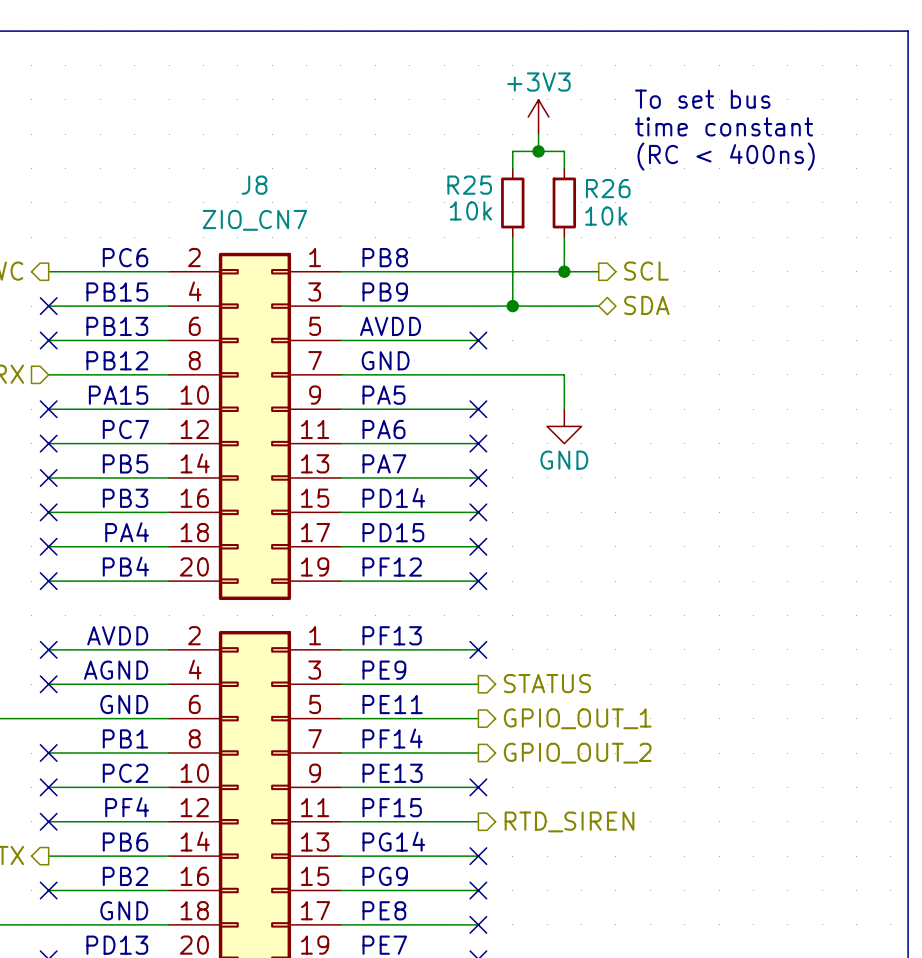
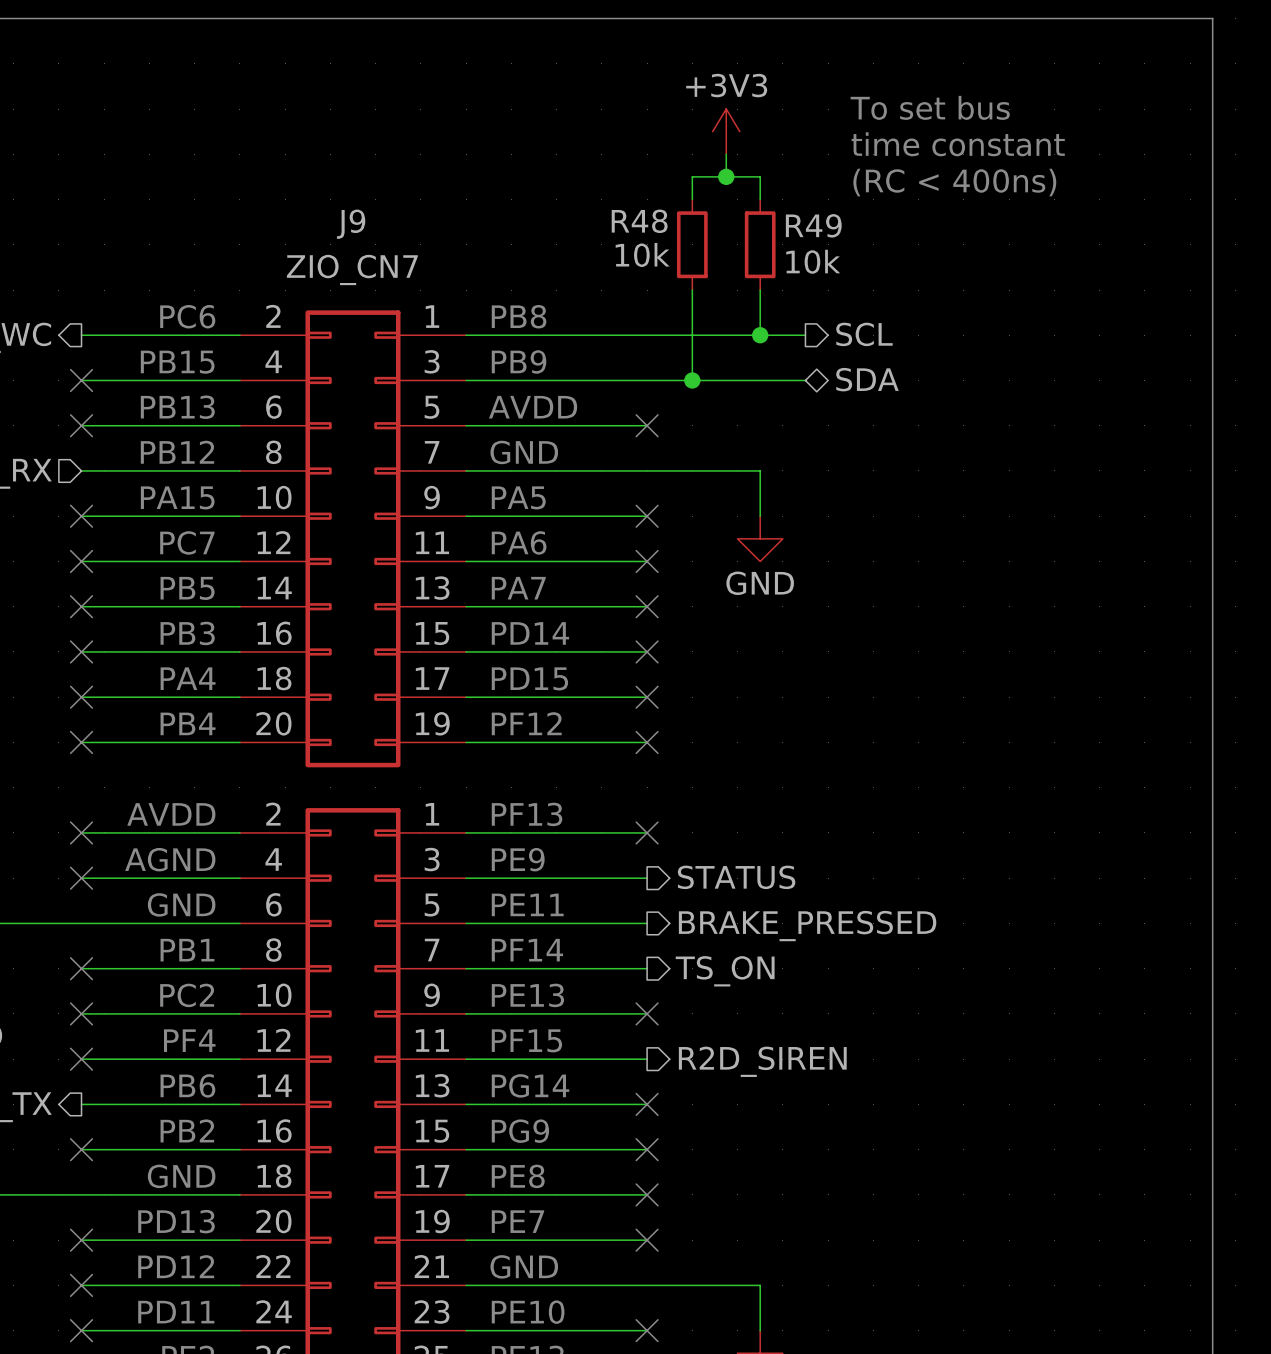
J8 name: J8 (254, 185) -> J9 (351, 224)
R25 name: R25 (469, 185) -> R48 (639, 221)
R26 name: R26 (608, 188) -> R49 (813, 225)
hierarchical label: GPIO_OUT_1 (577, 718) -> BRAKE_PRESSED (807, 926)
hierarchical label: GPIO_OUT_2 (577, 753) -> TS_ON (725, 971)
hierarchical label: RTD_SIREN (569, 821) -> R2D_SIREN (762, 1061)

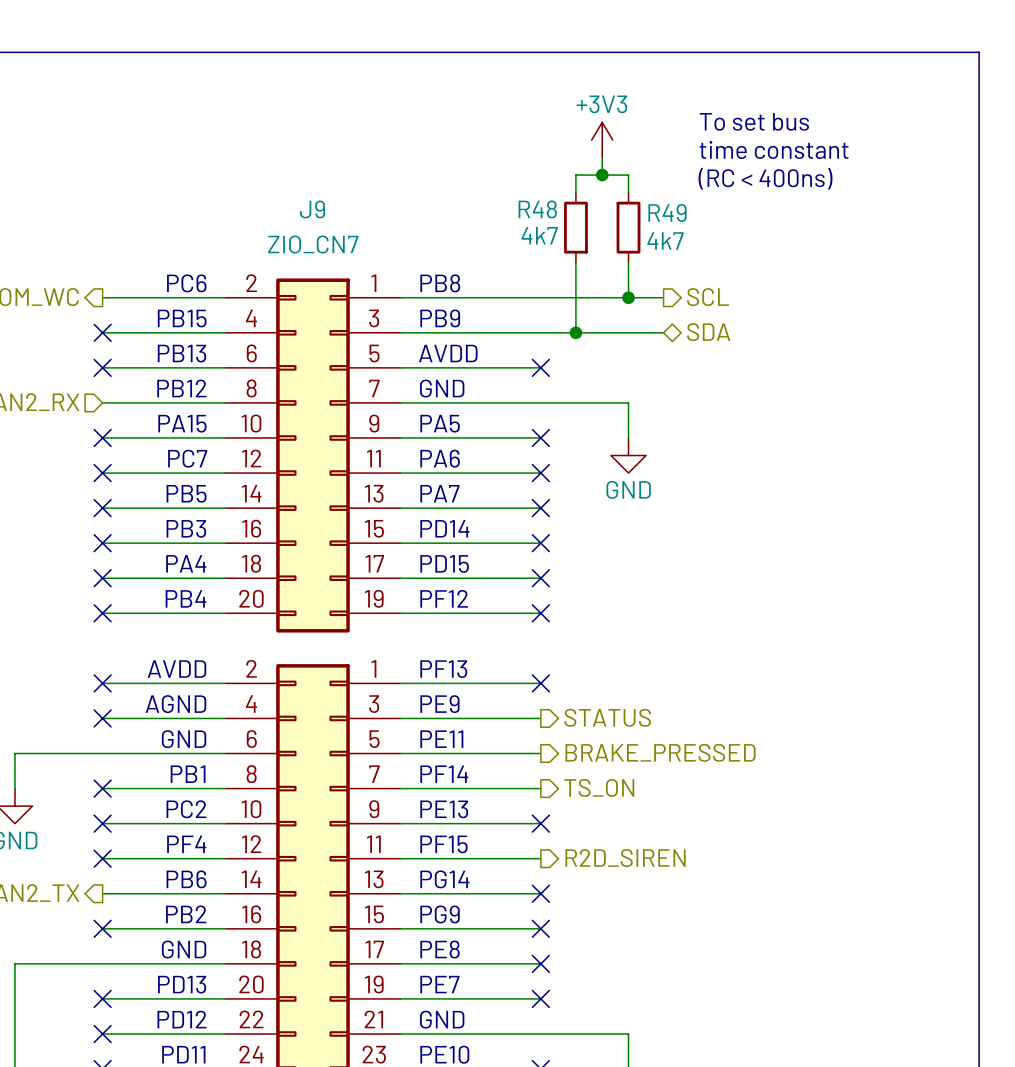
R48 value: 10k (642, 254) -> 4k7 (539, 235)
R49 value: 10k (813, 261) -> 4k7 (665, 241)

